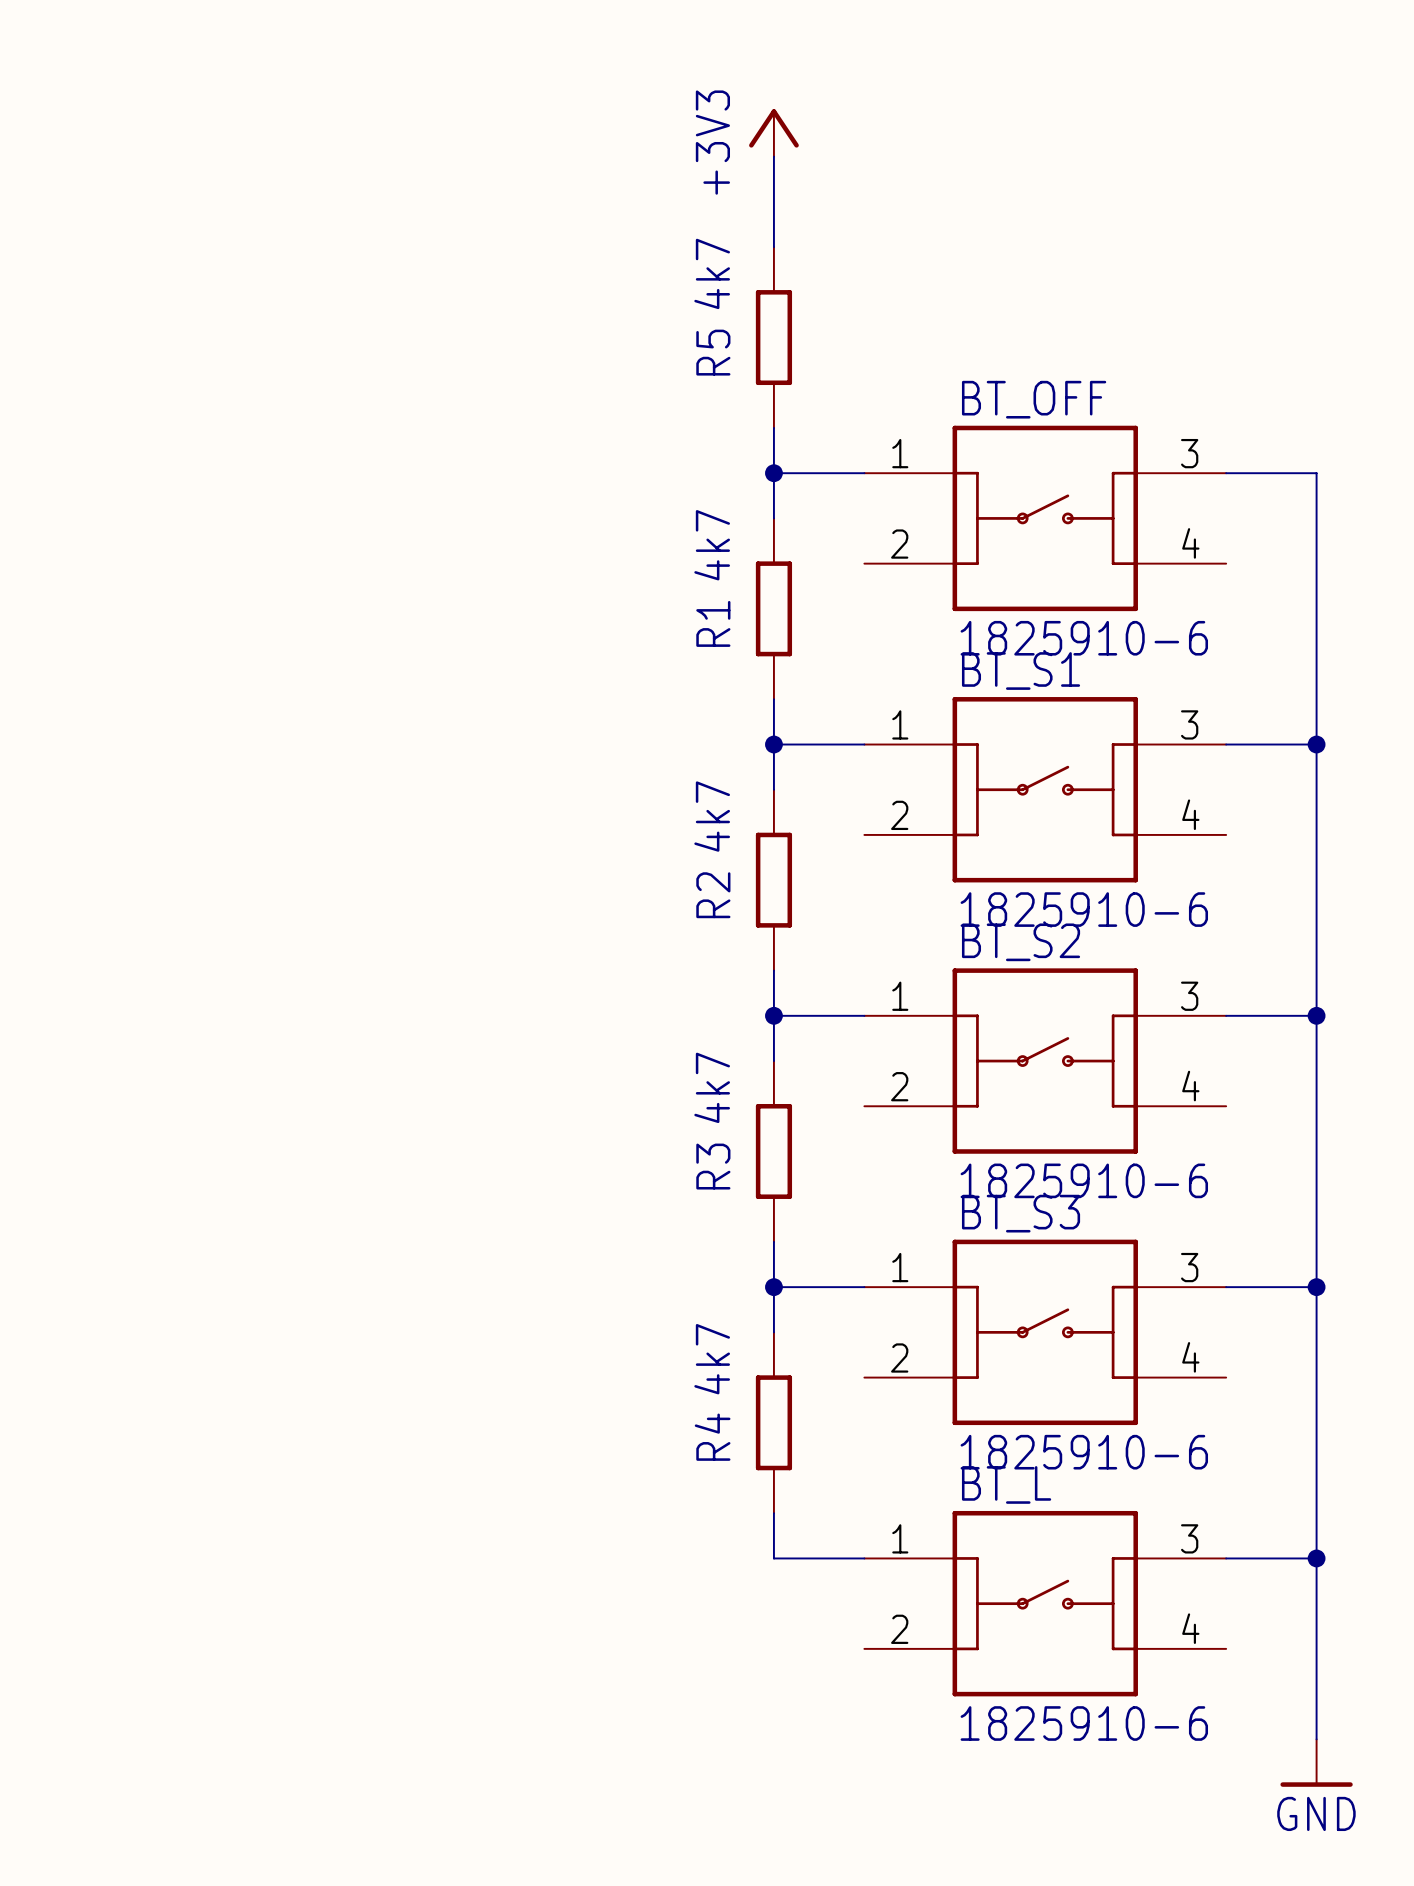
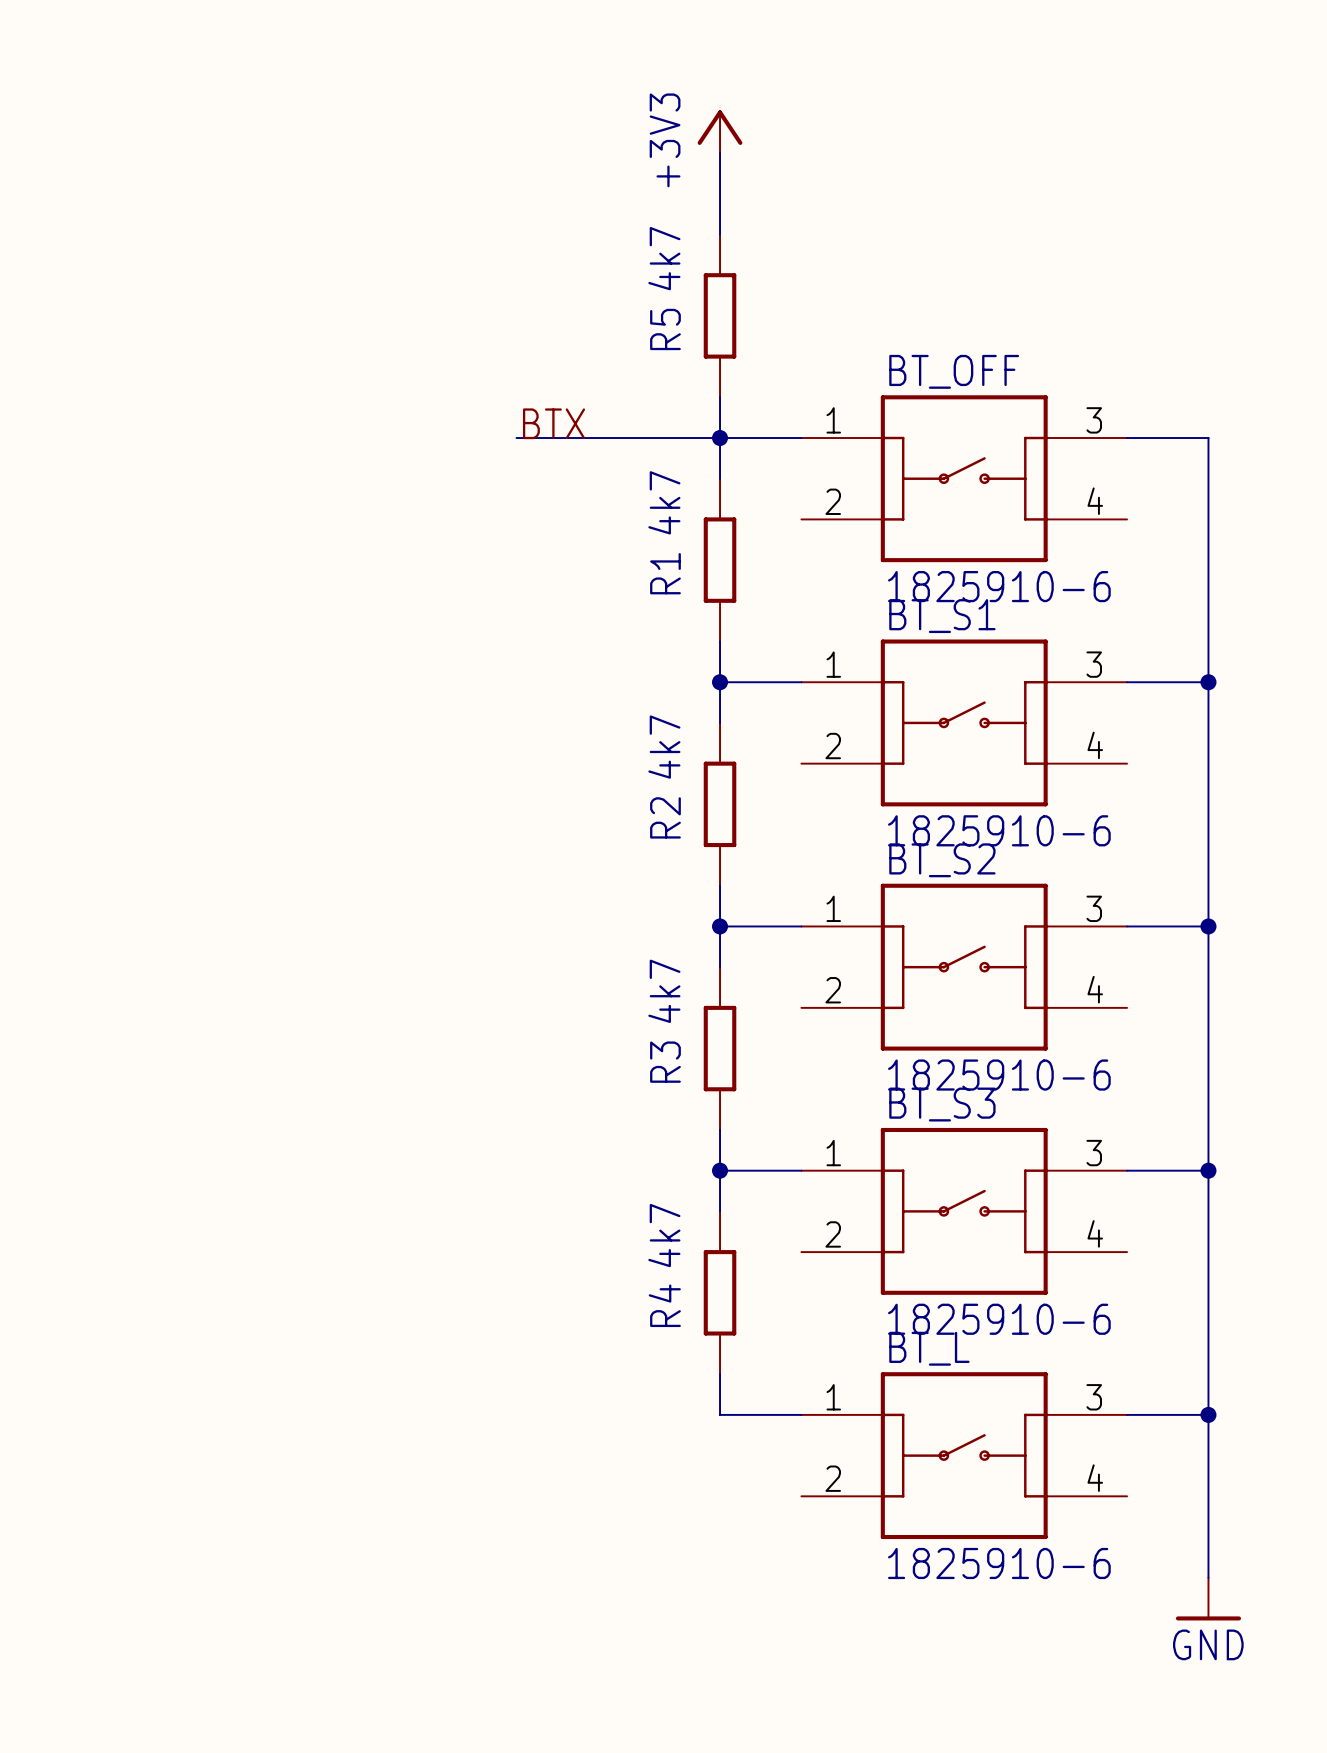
label: none -> BTX (554, 423)
wire: none -> (516, 438) (720, 438)

